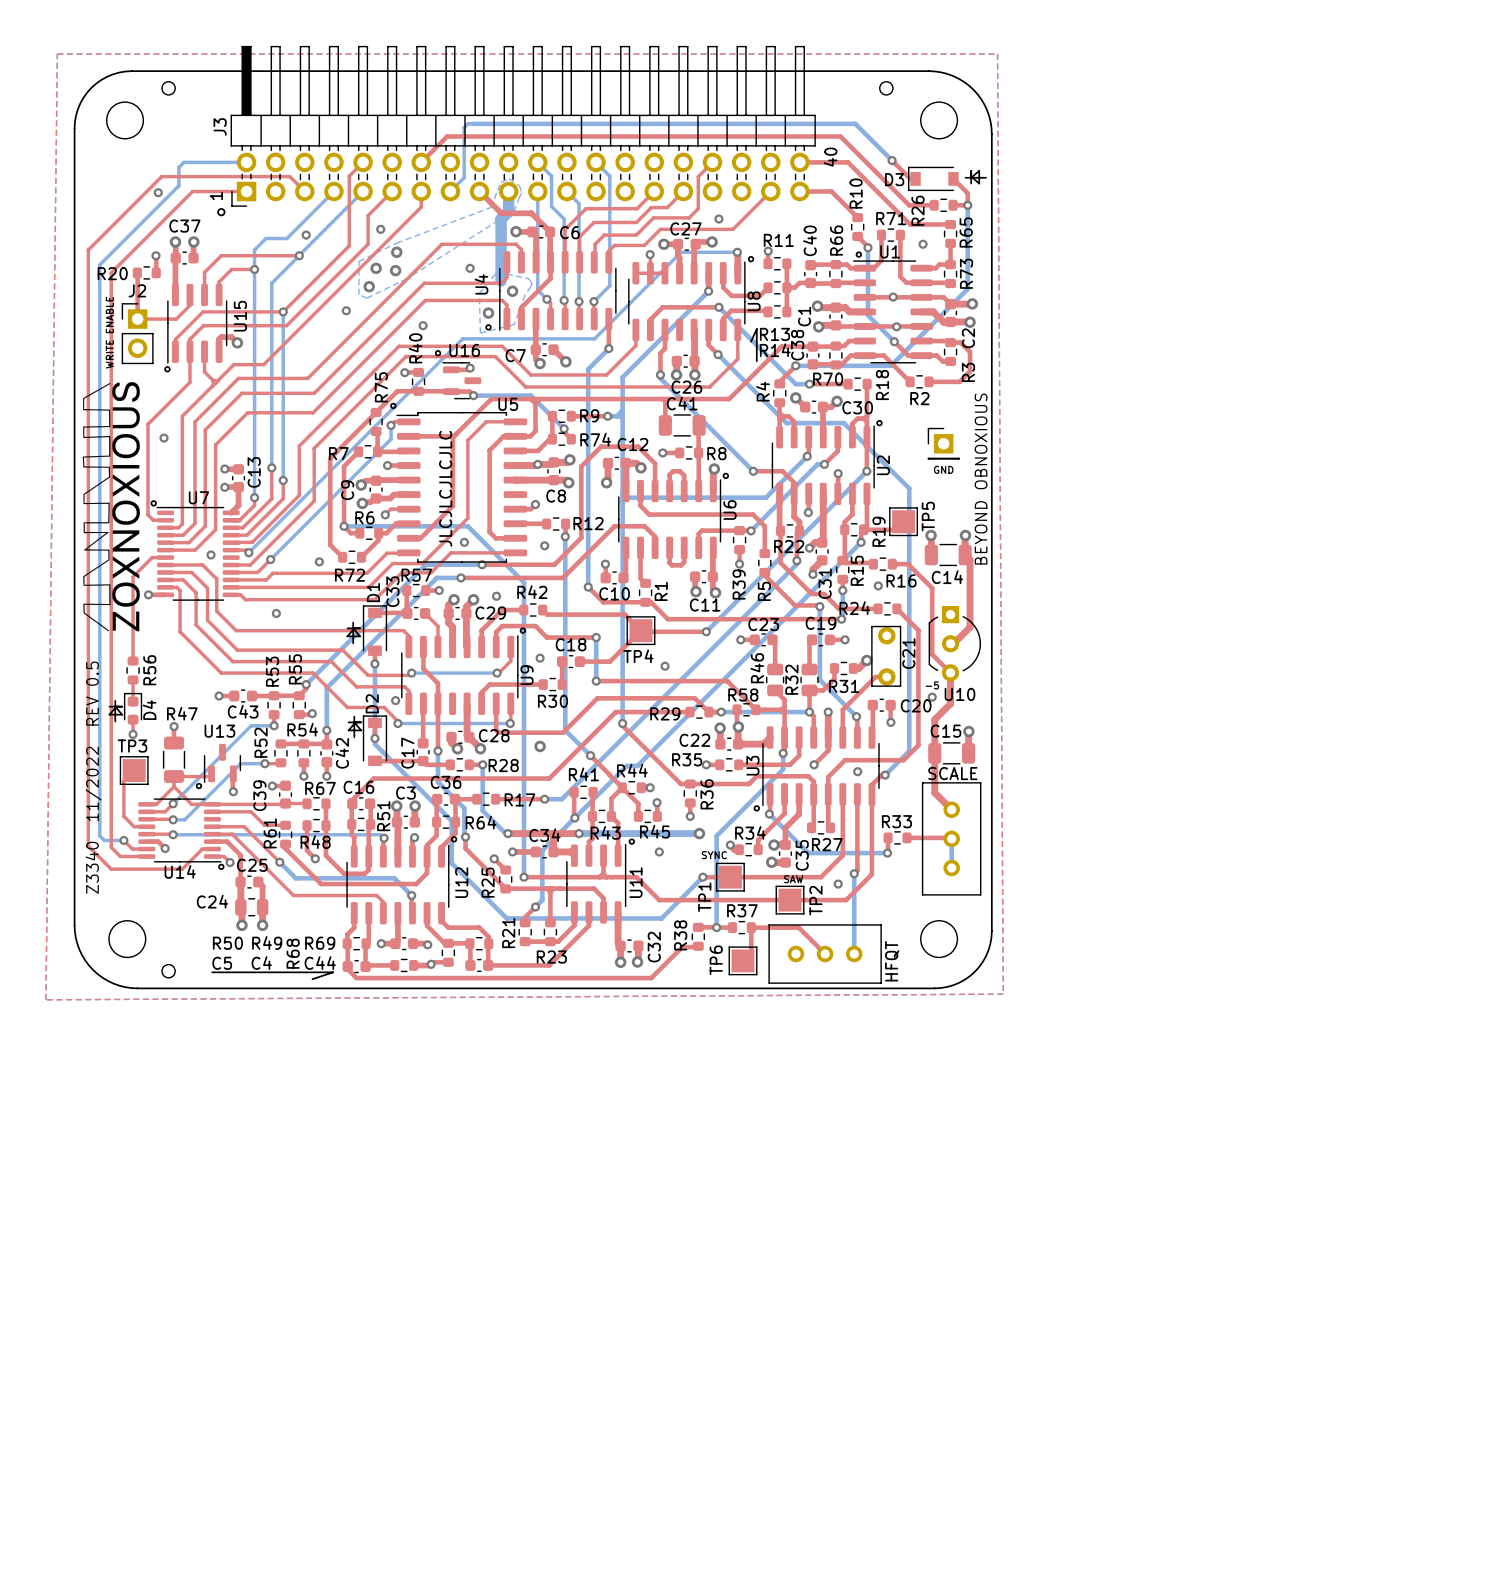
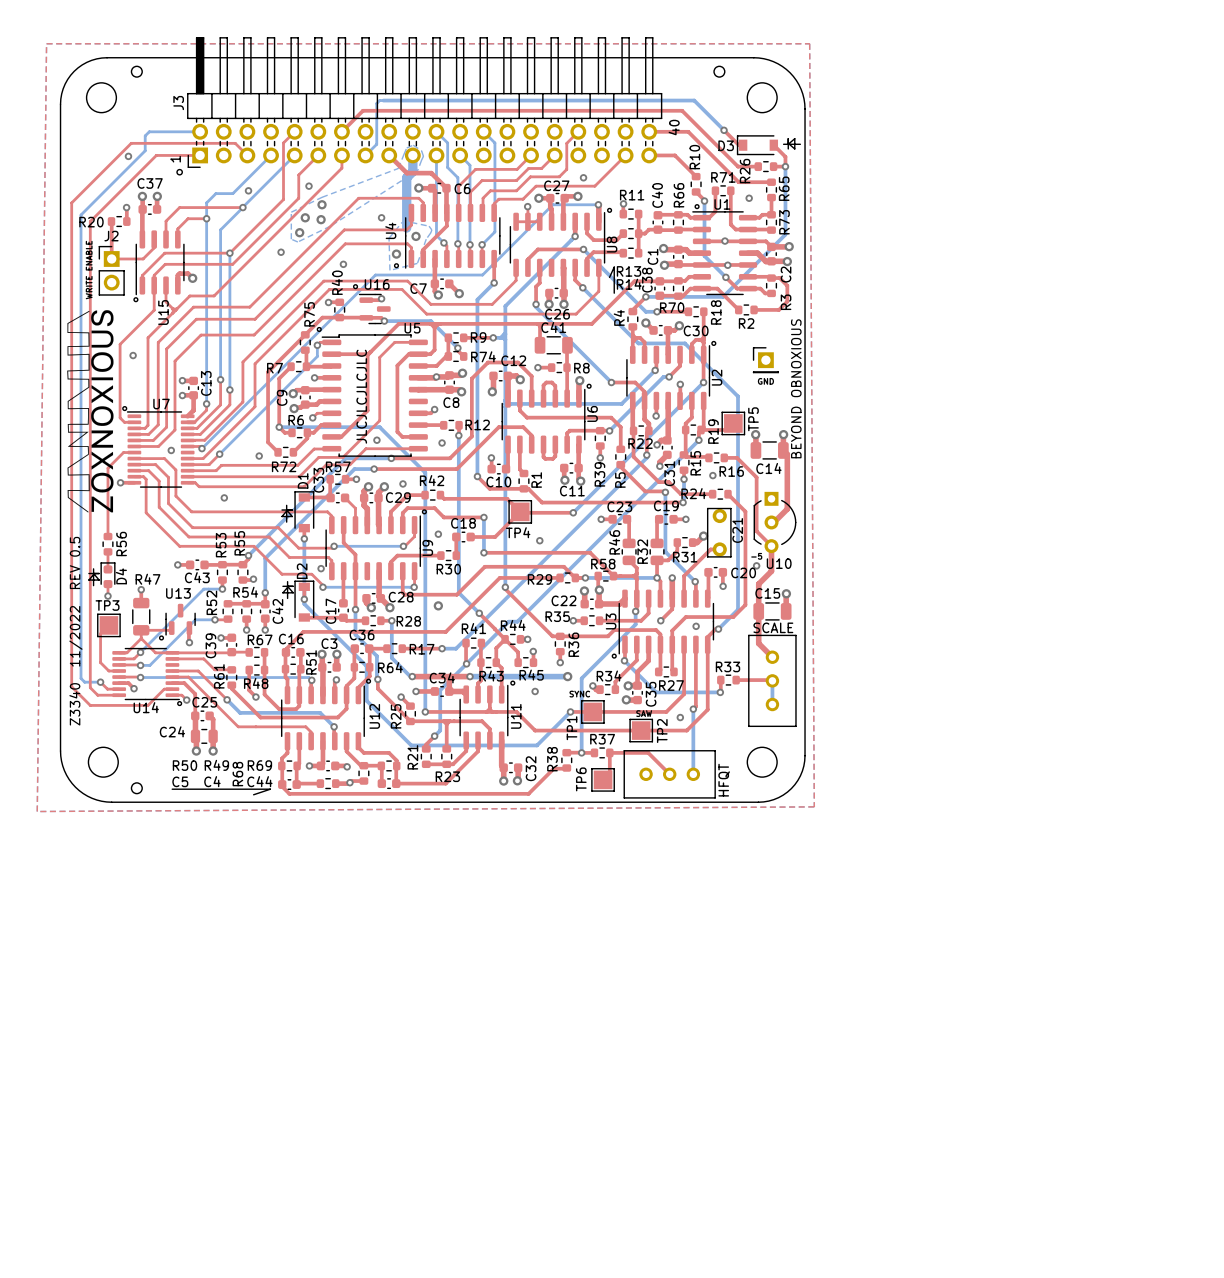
U15 name position: U15 (240, 316) -> U15 (163, 312)

